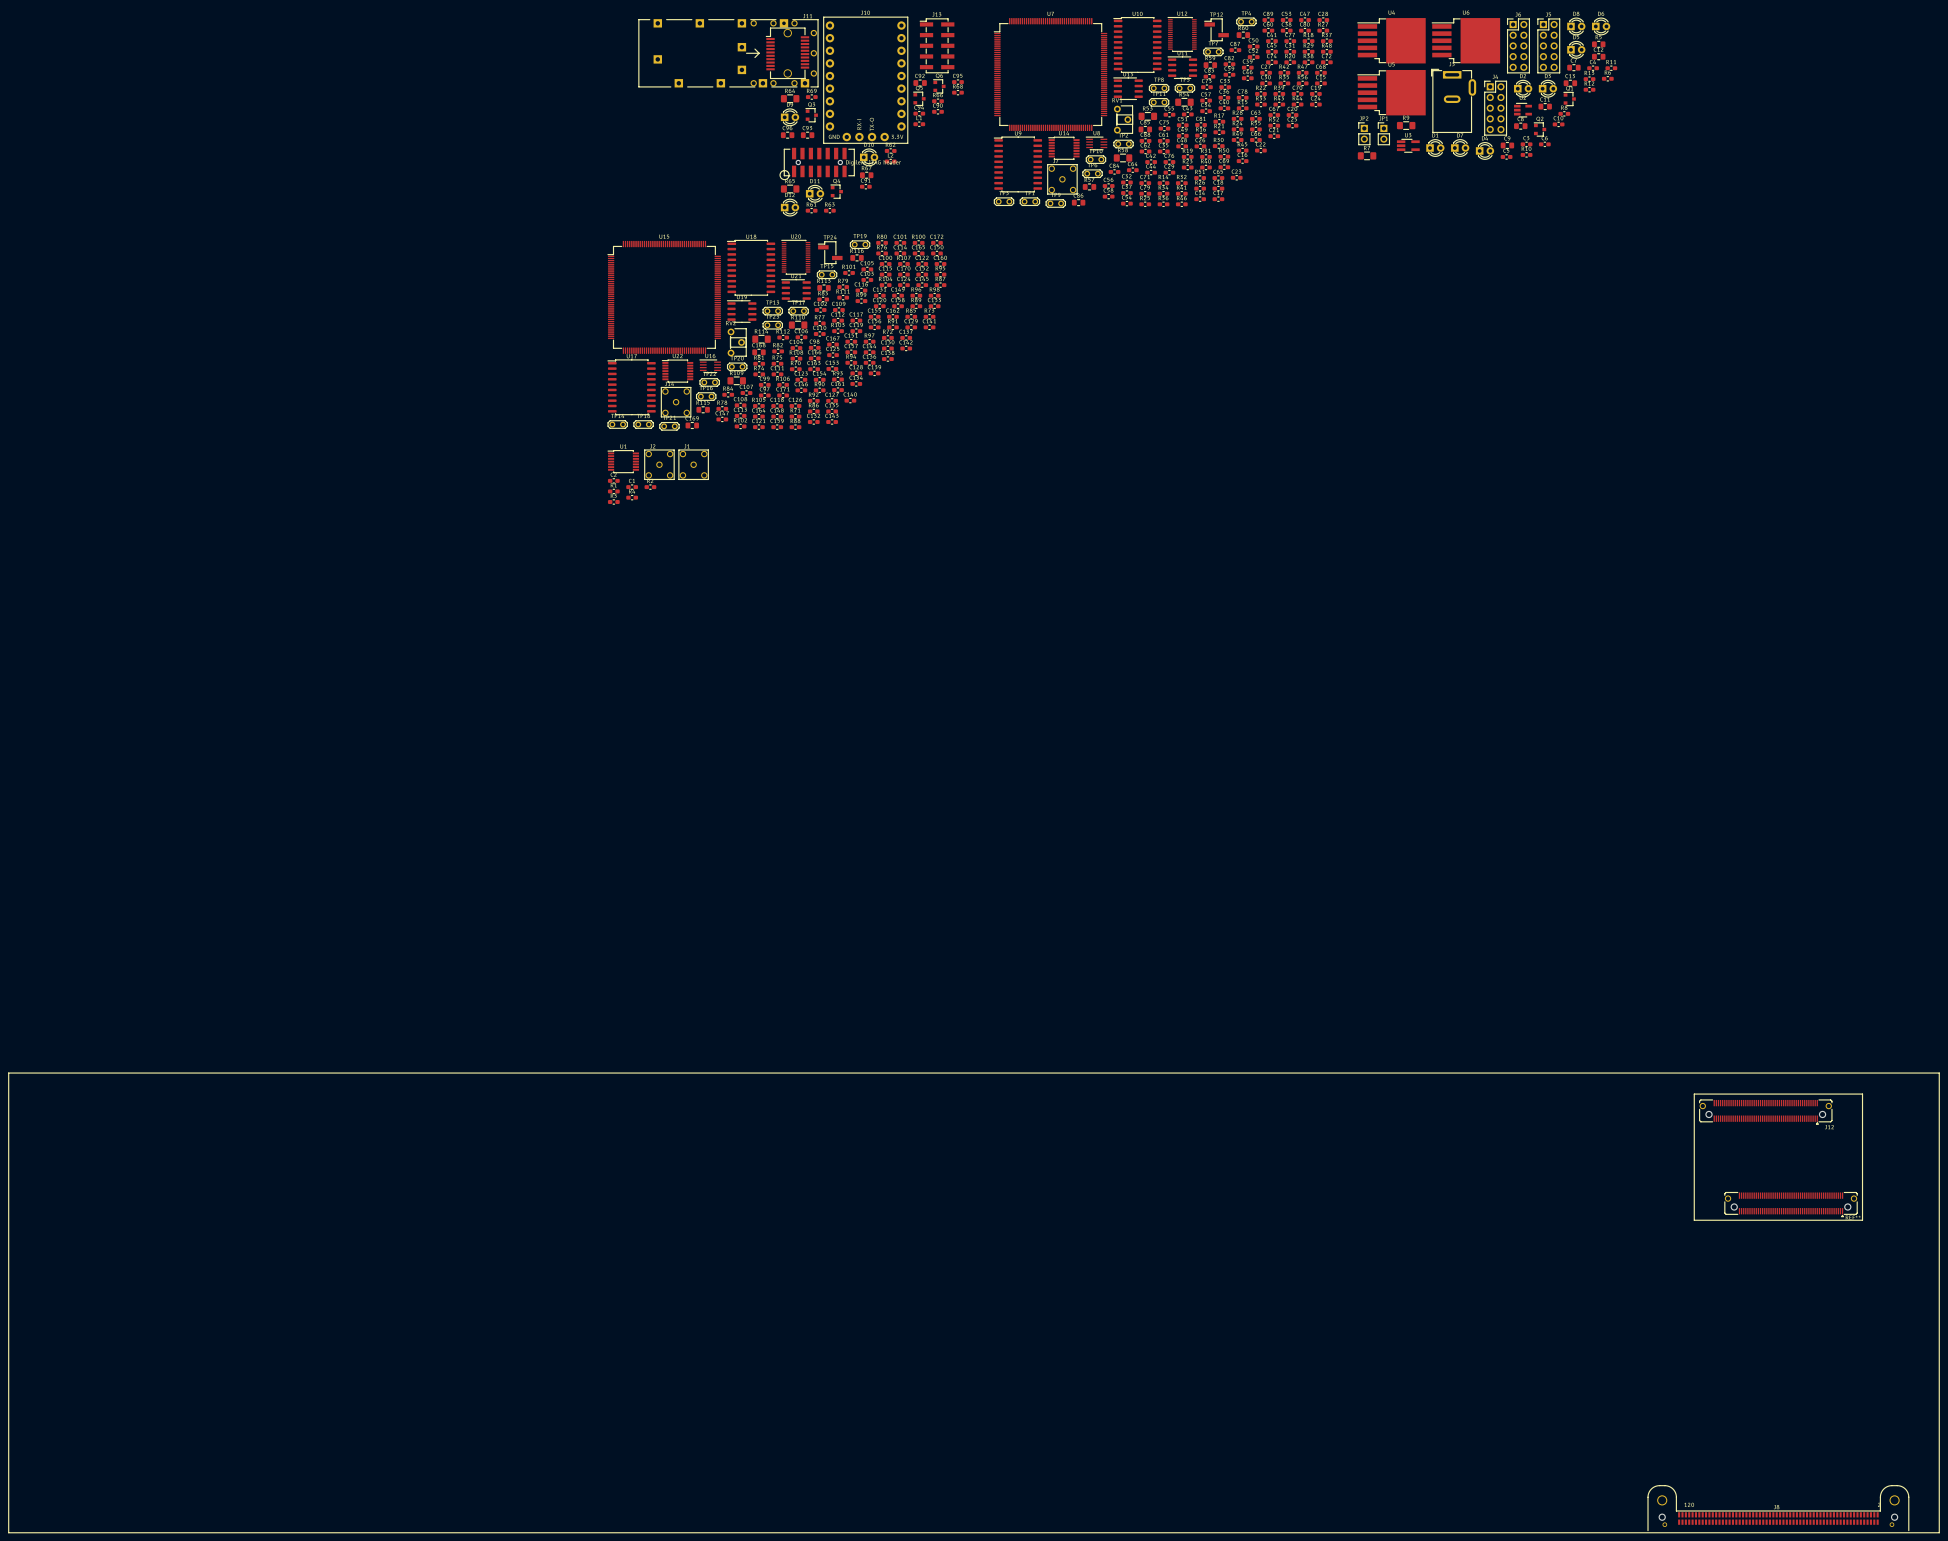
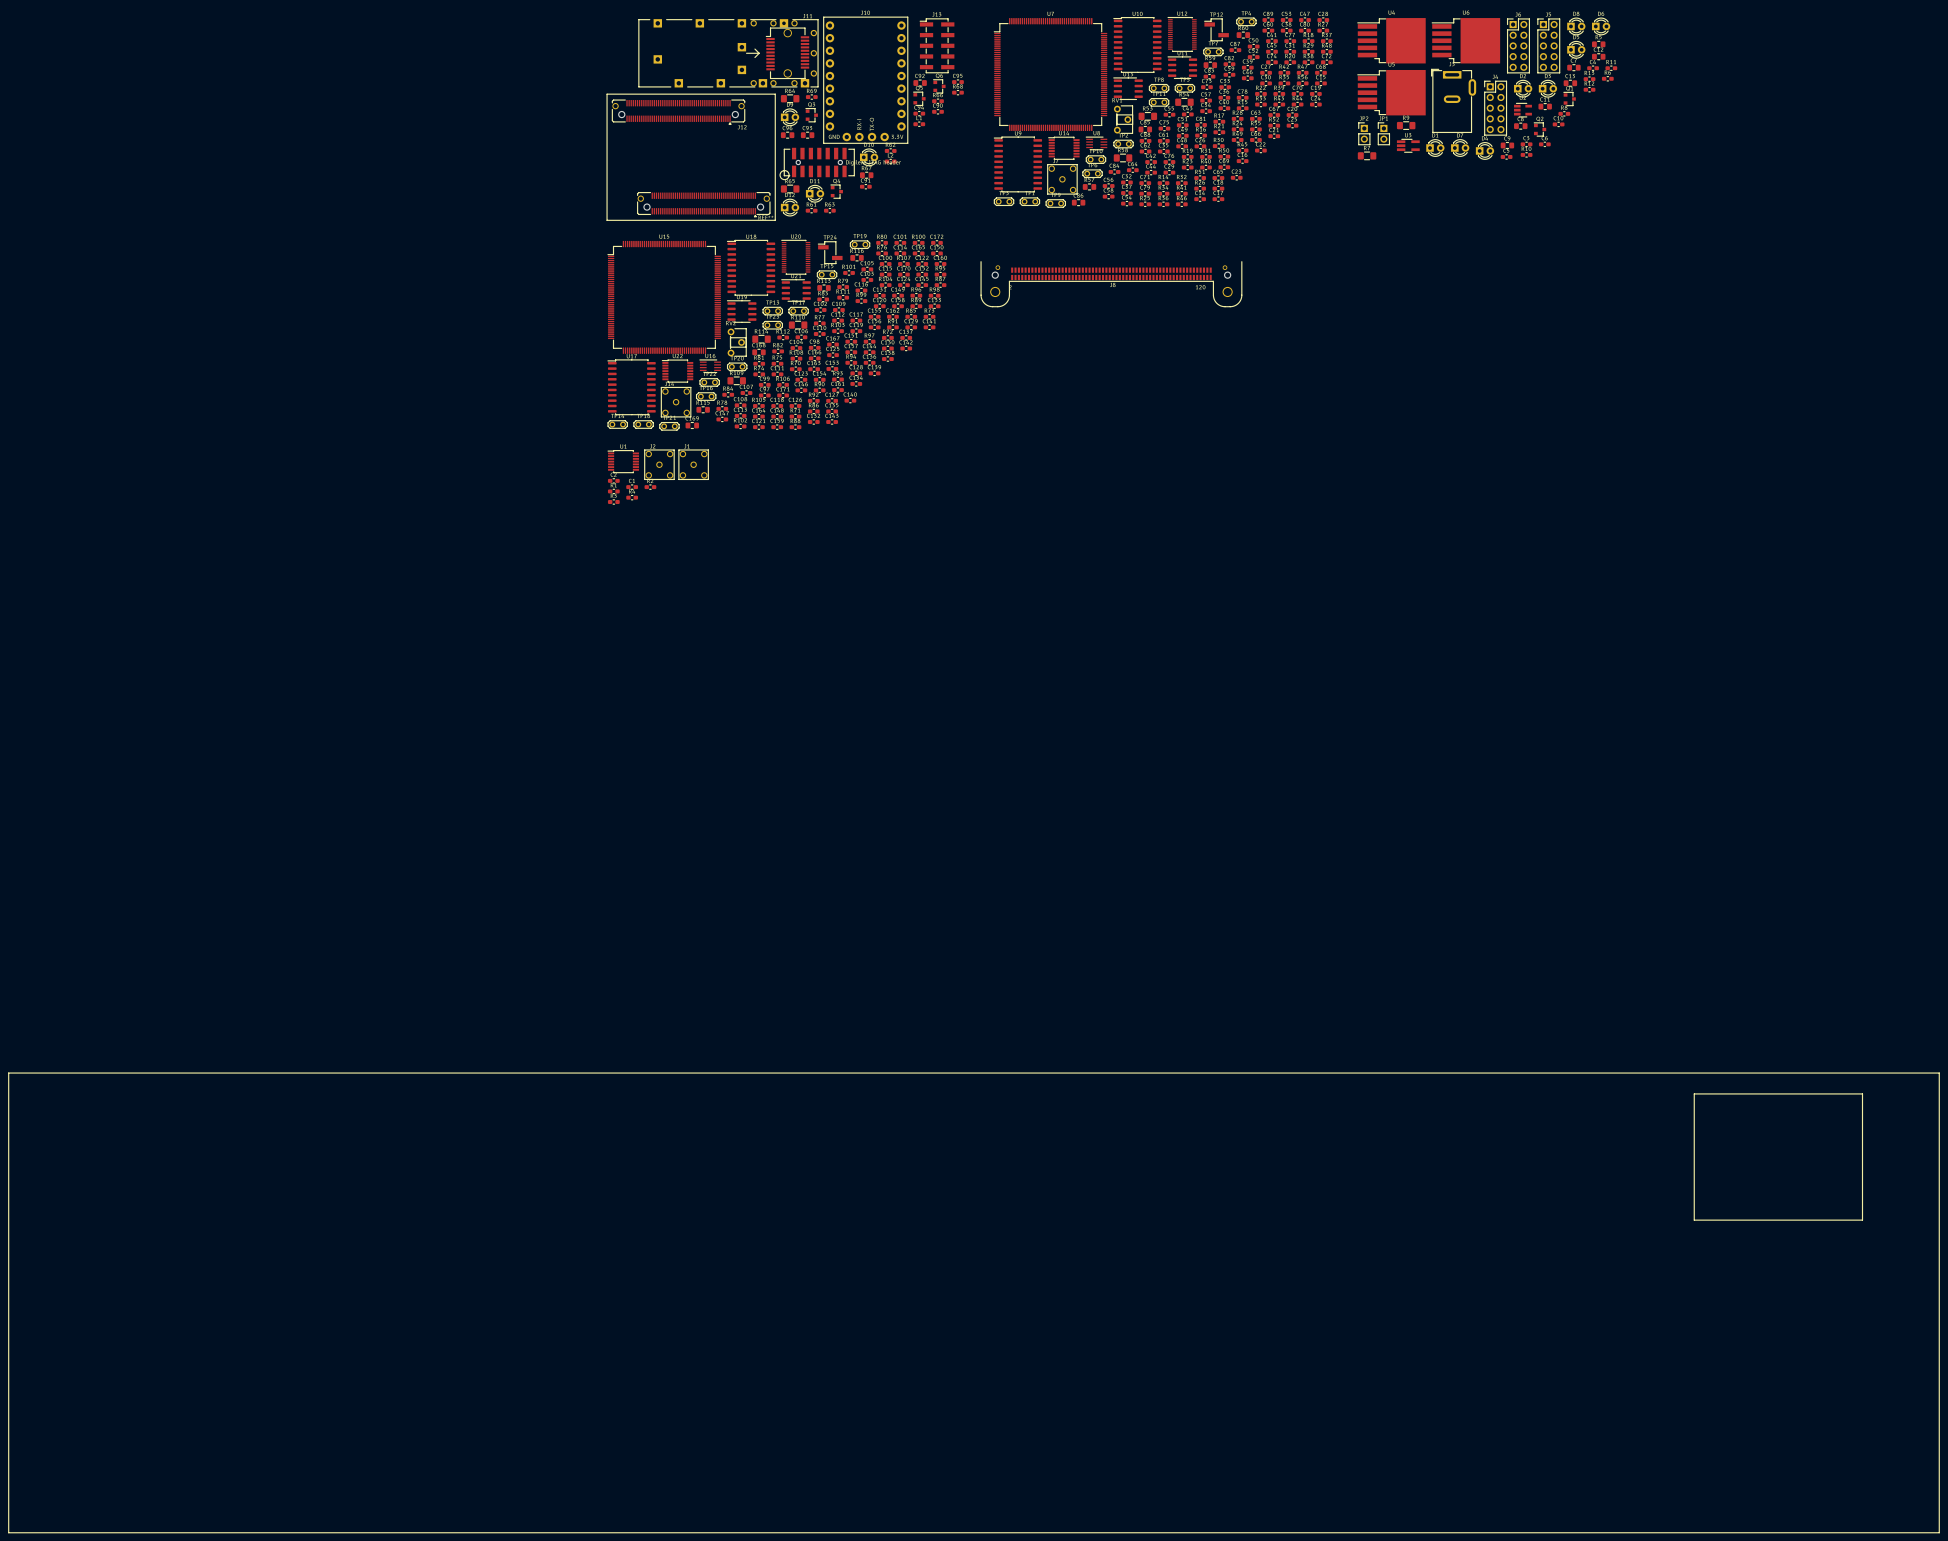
line: none -> (1694, 1093) (1694, 1220) (1862, 1220) (1862, 1093) (1694, 1093)
part position: (1778, 1157) -> (691, 157)
part rotation: 0° (1778, 1508) -> 180° (1111, 284)
part position: (1778, 1508) -> (1111, 284)

